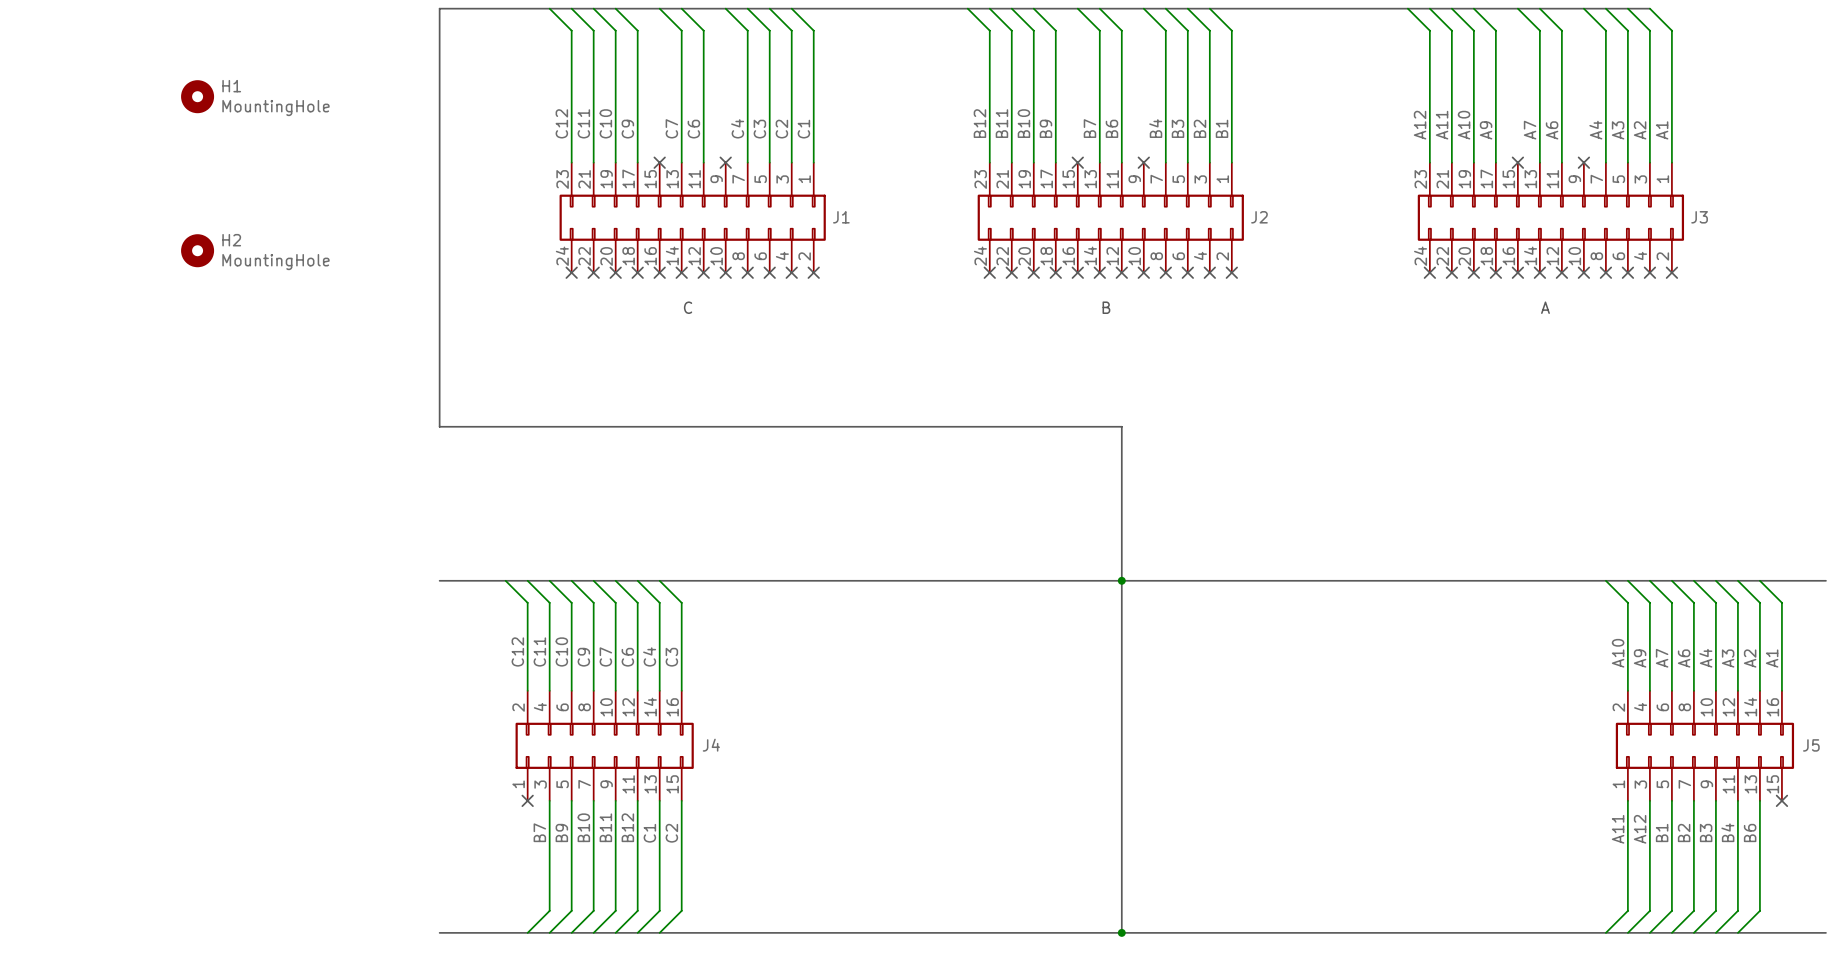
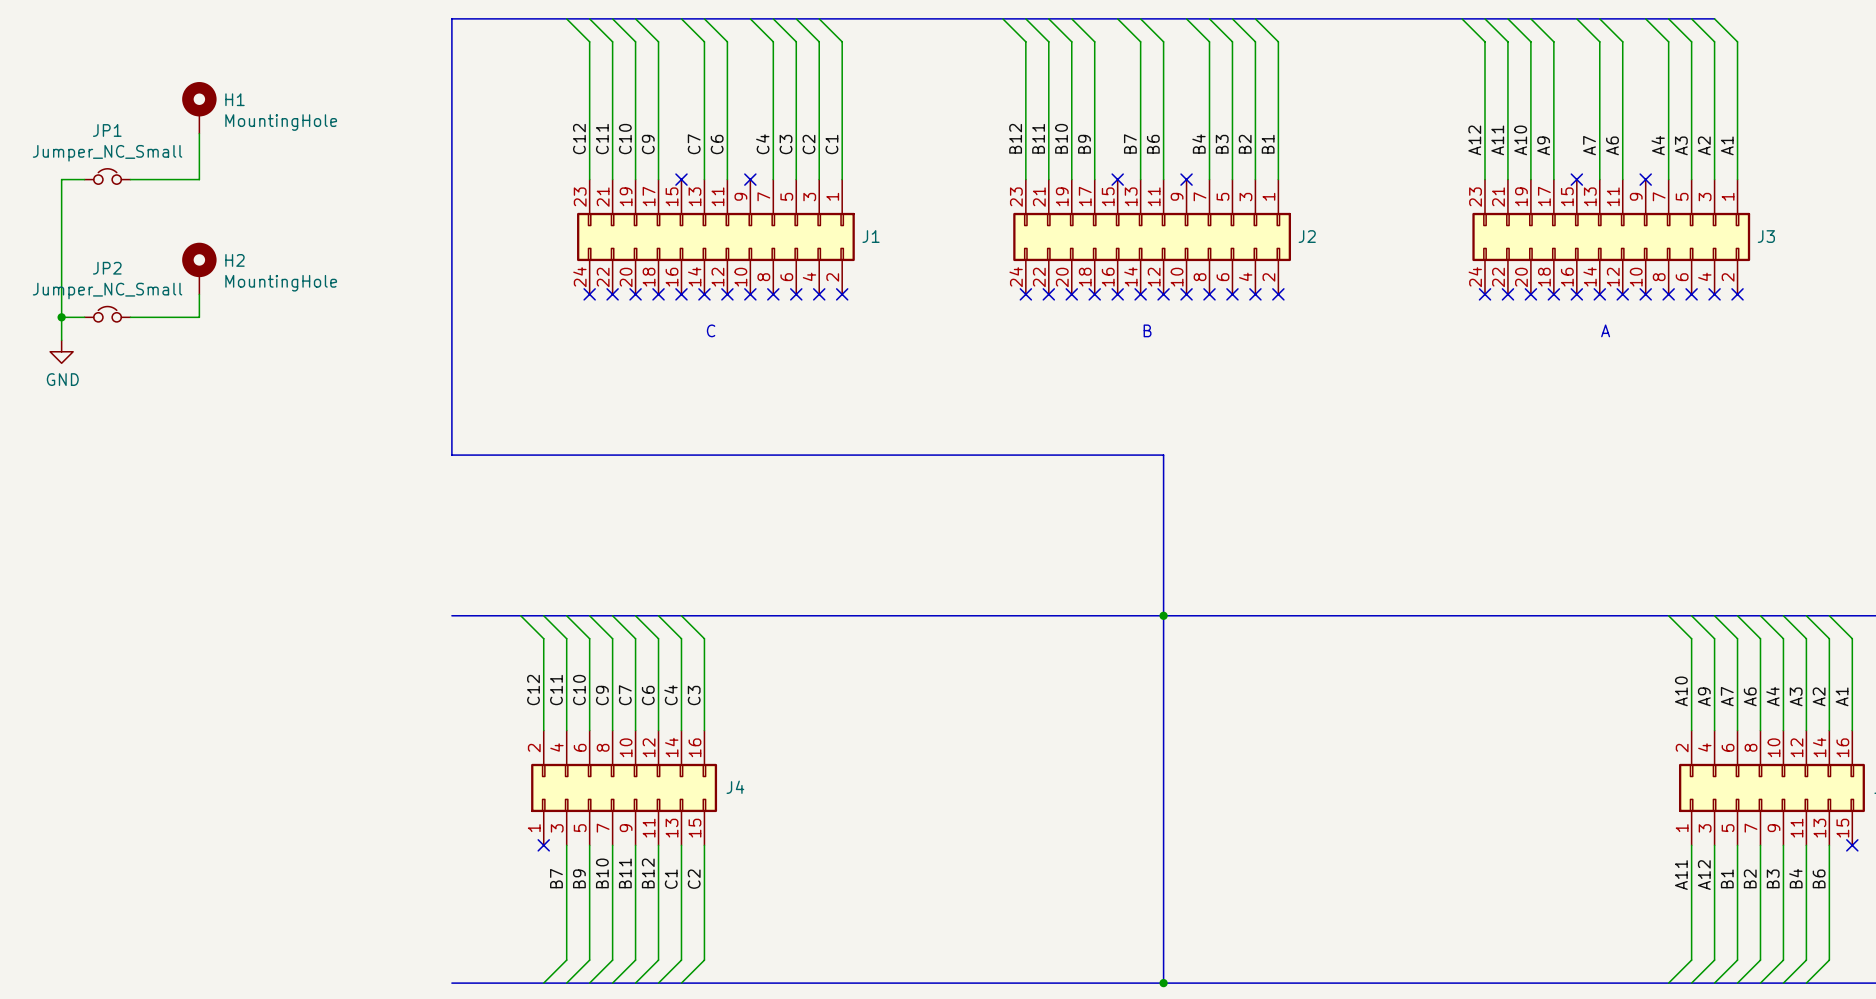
H1 symbol: [181, 80, 215, 114] -> [182, 82, 217, 134]
wire: none -> (199, 133) (199, 179) (130, 179)
JP1: none -> Jumper_NC_Small (107, 176)
wire: none -> (84, 179) (61, 179) (61, 340)
H2 symbol: [181, 234, 215, 268] -> [182, 242, 217, 295]
wire: none -> (199, 294) (199, 317) (130, 317)
JP2: none -> Jumper_NC_Small (107, 314)
wire: none -> (61, 317) (84, 317)
junction: none -> (61, 317)
power symbol: none -> GND (61, 351)

